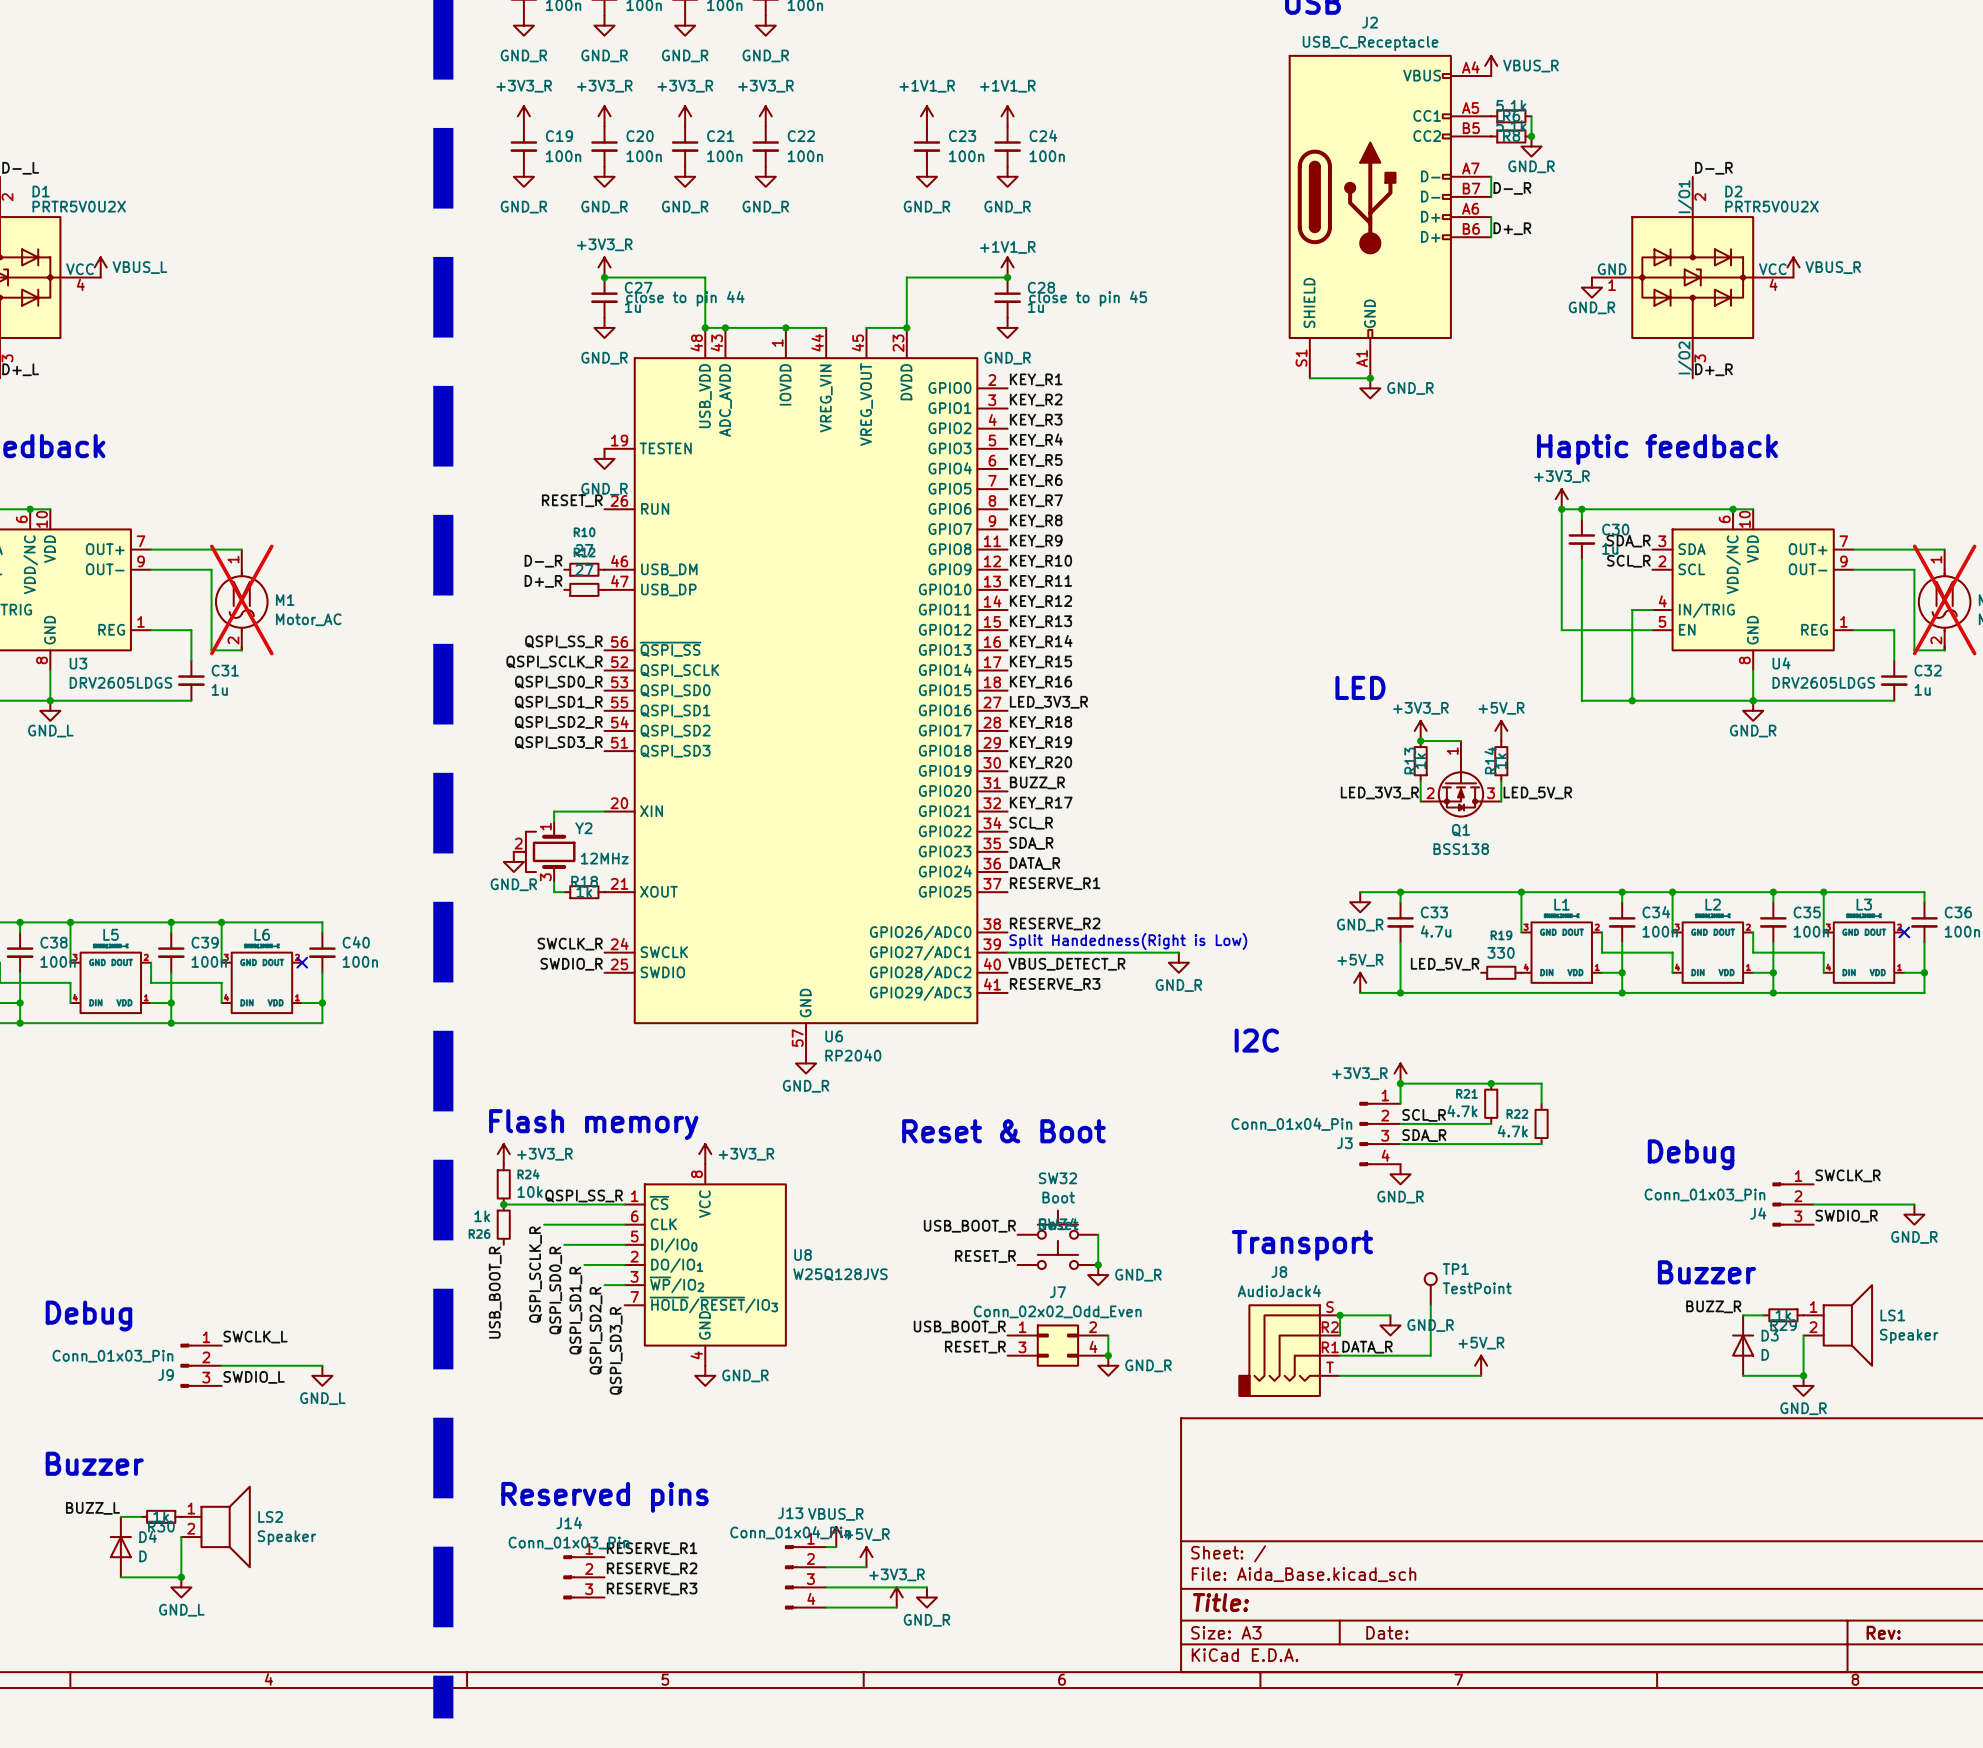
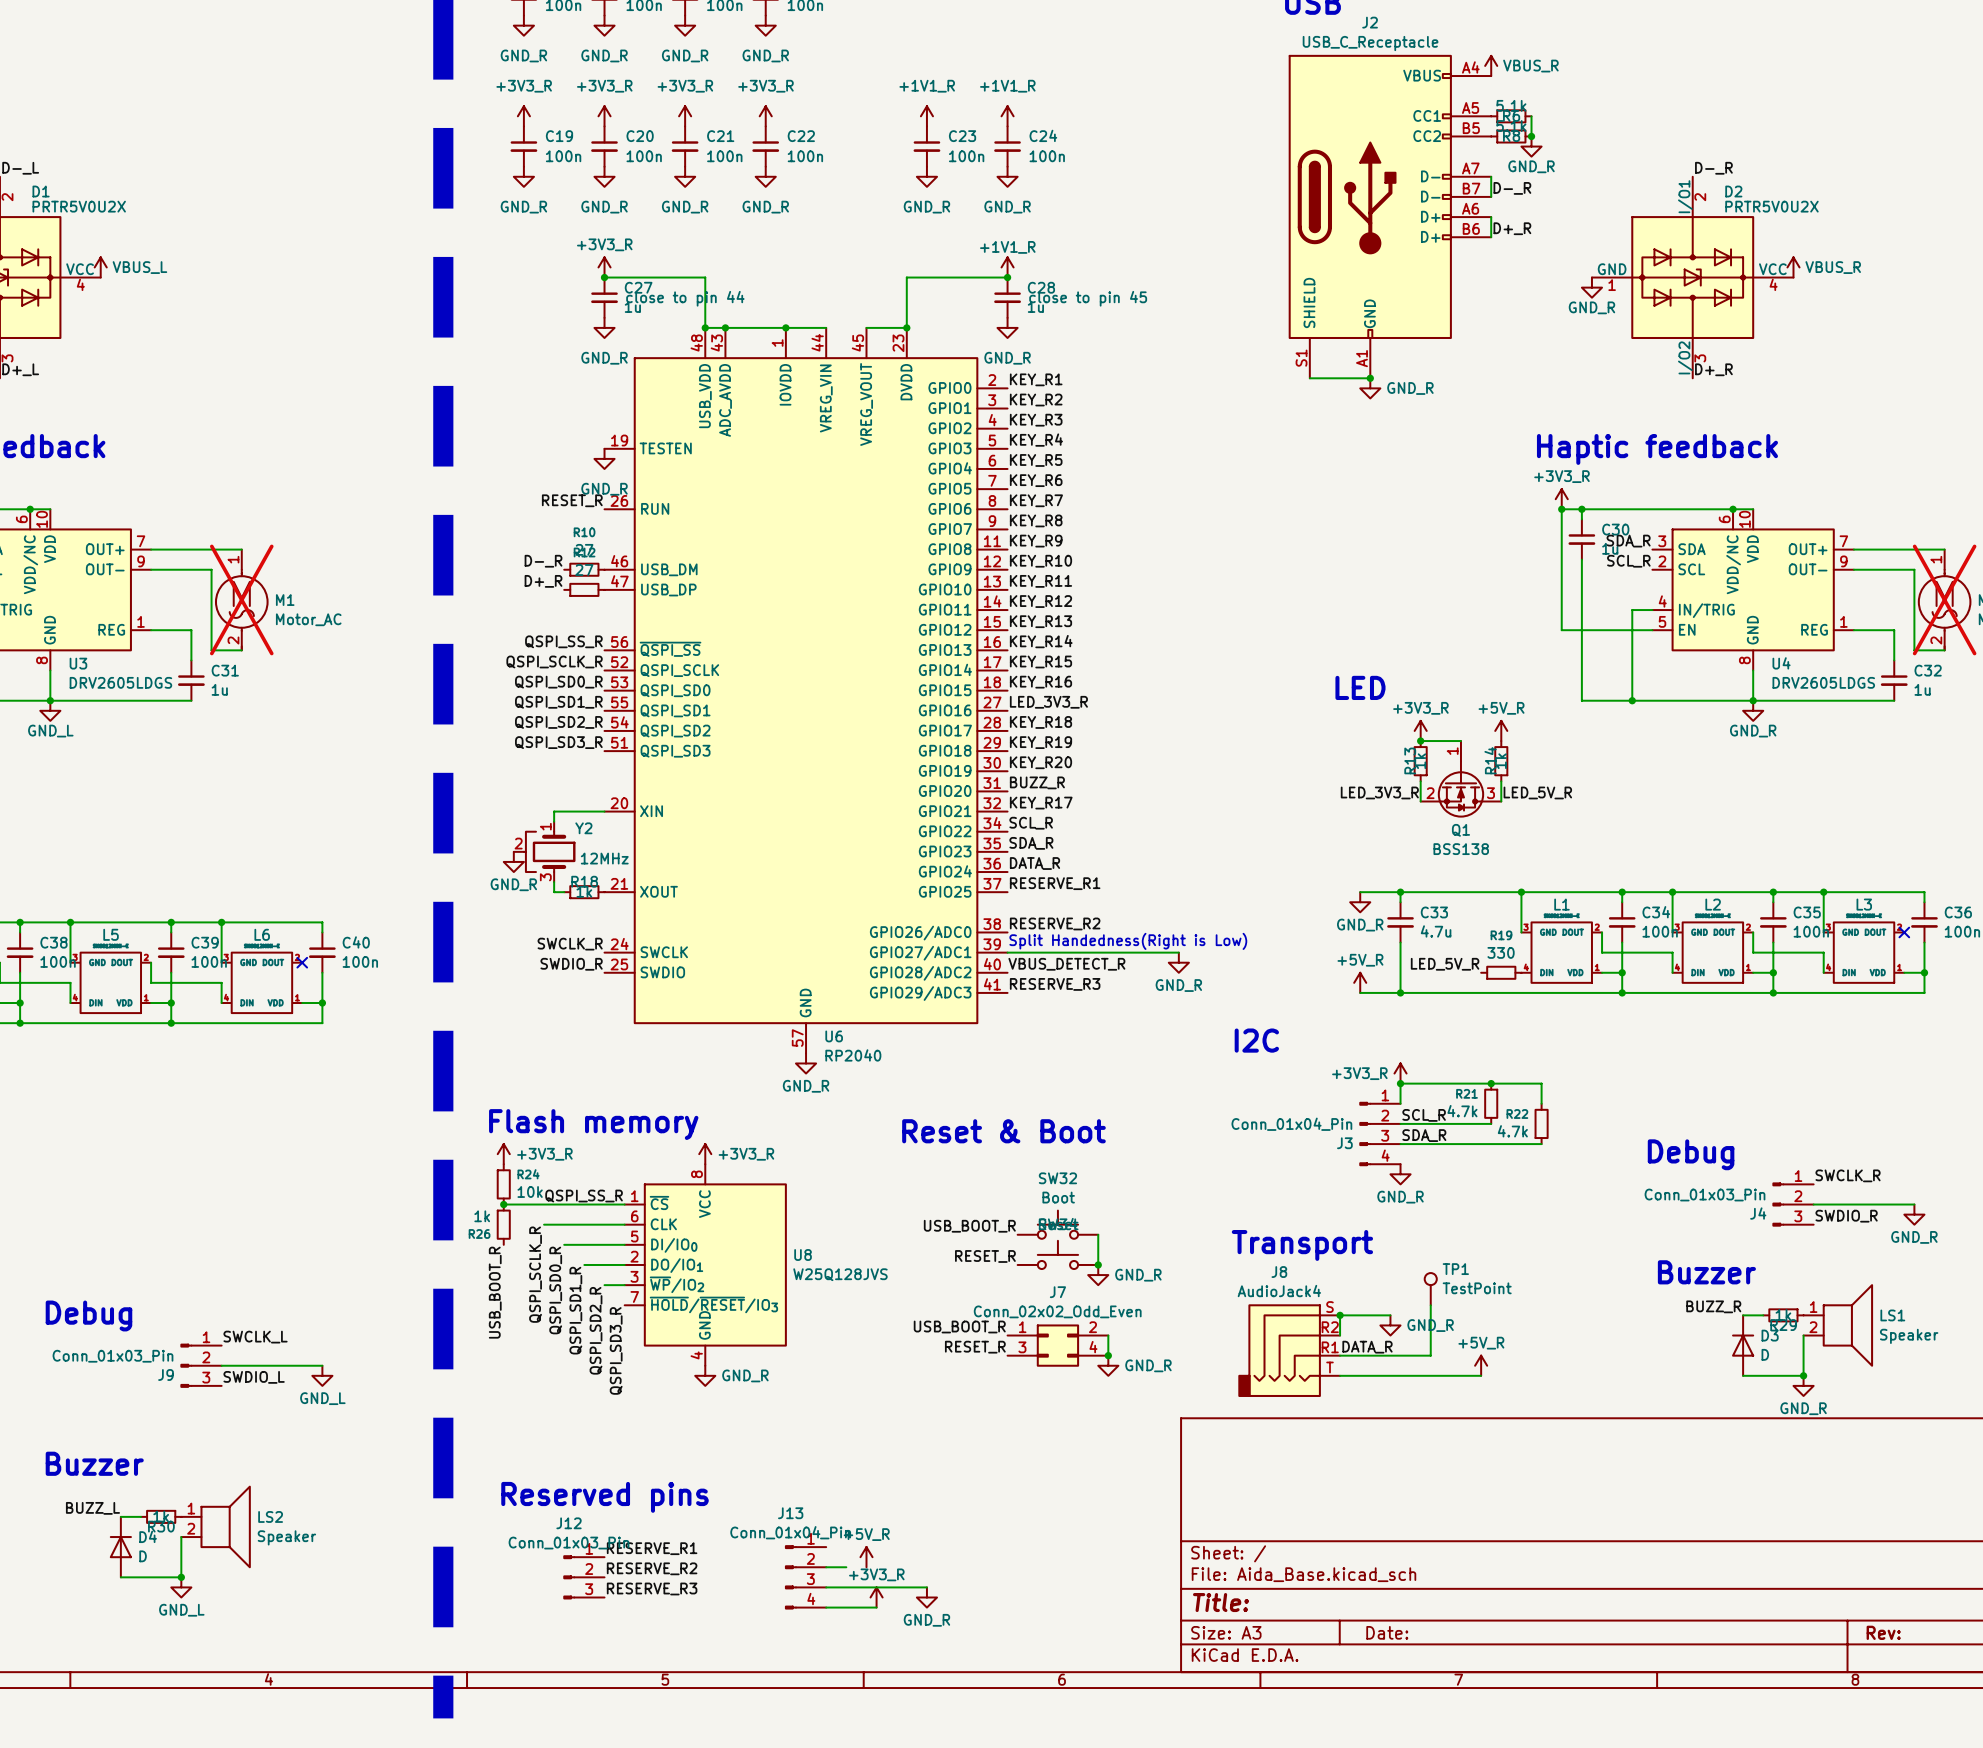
J14 name: J14 (569, 1523) -> J12 (569, 1523)
power symbol: VBUS_R (836, 1537) -> none
wire: (826, 1547) (836, 1547) -> none
wire: (846, 1567) (866, 1567) -> none
power symbol position: +3V3_R (896, 1597) -> +3V3_R (876, 1597)
wire: (876, 1607) (896, 1607) -> none

